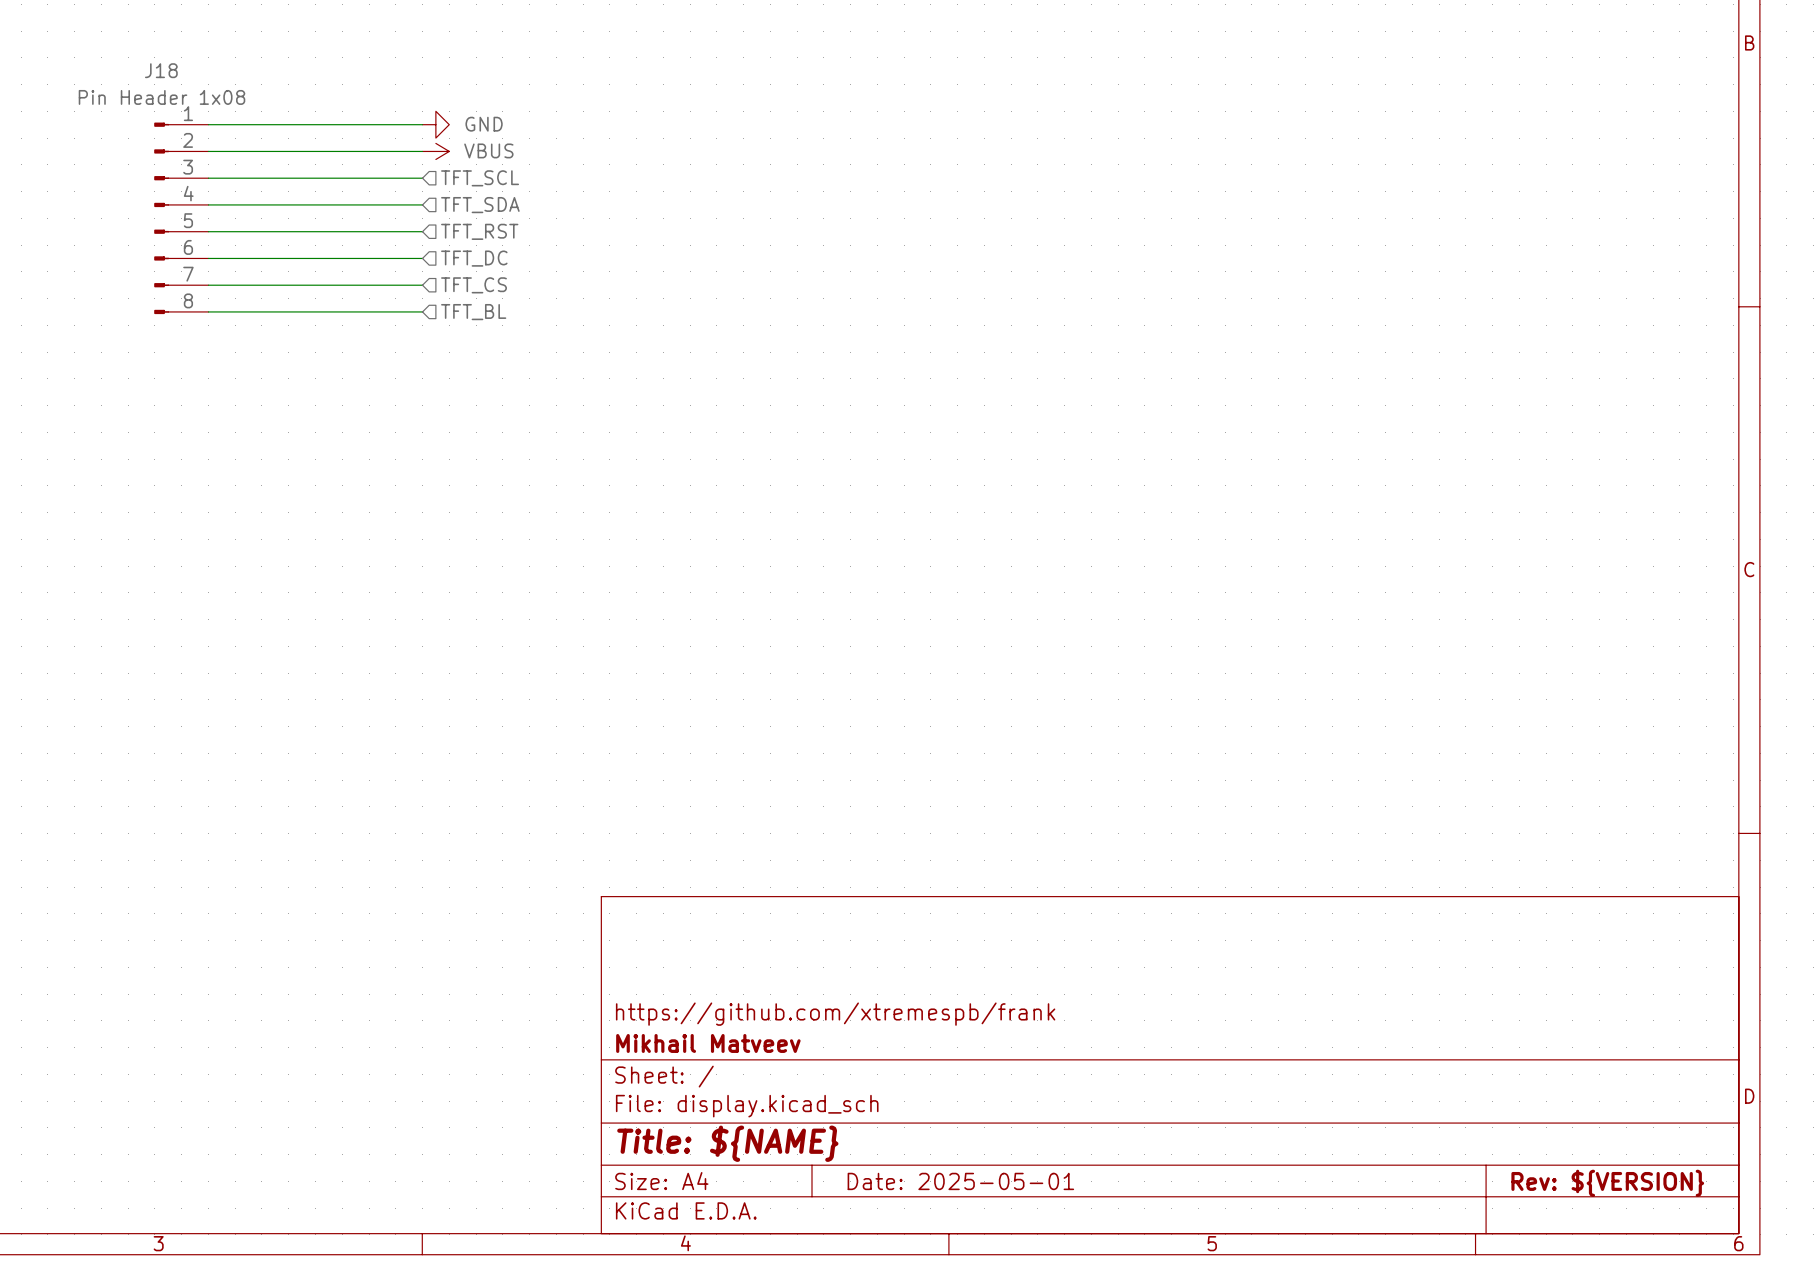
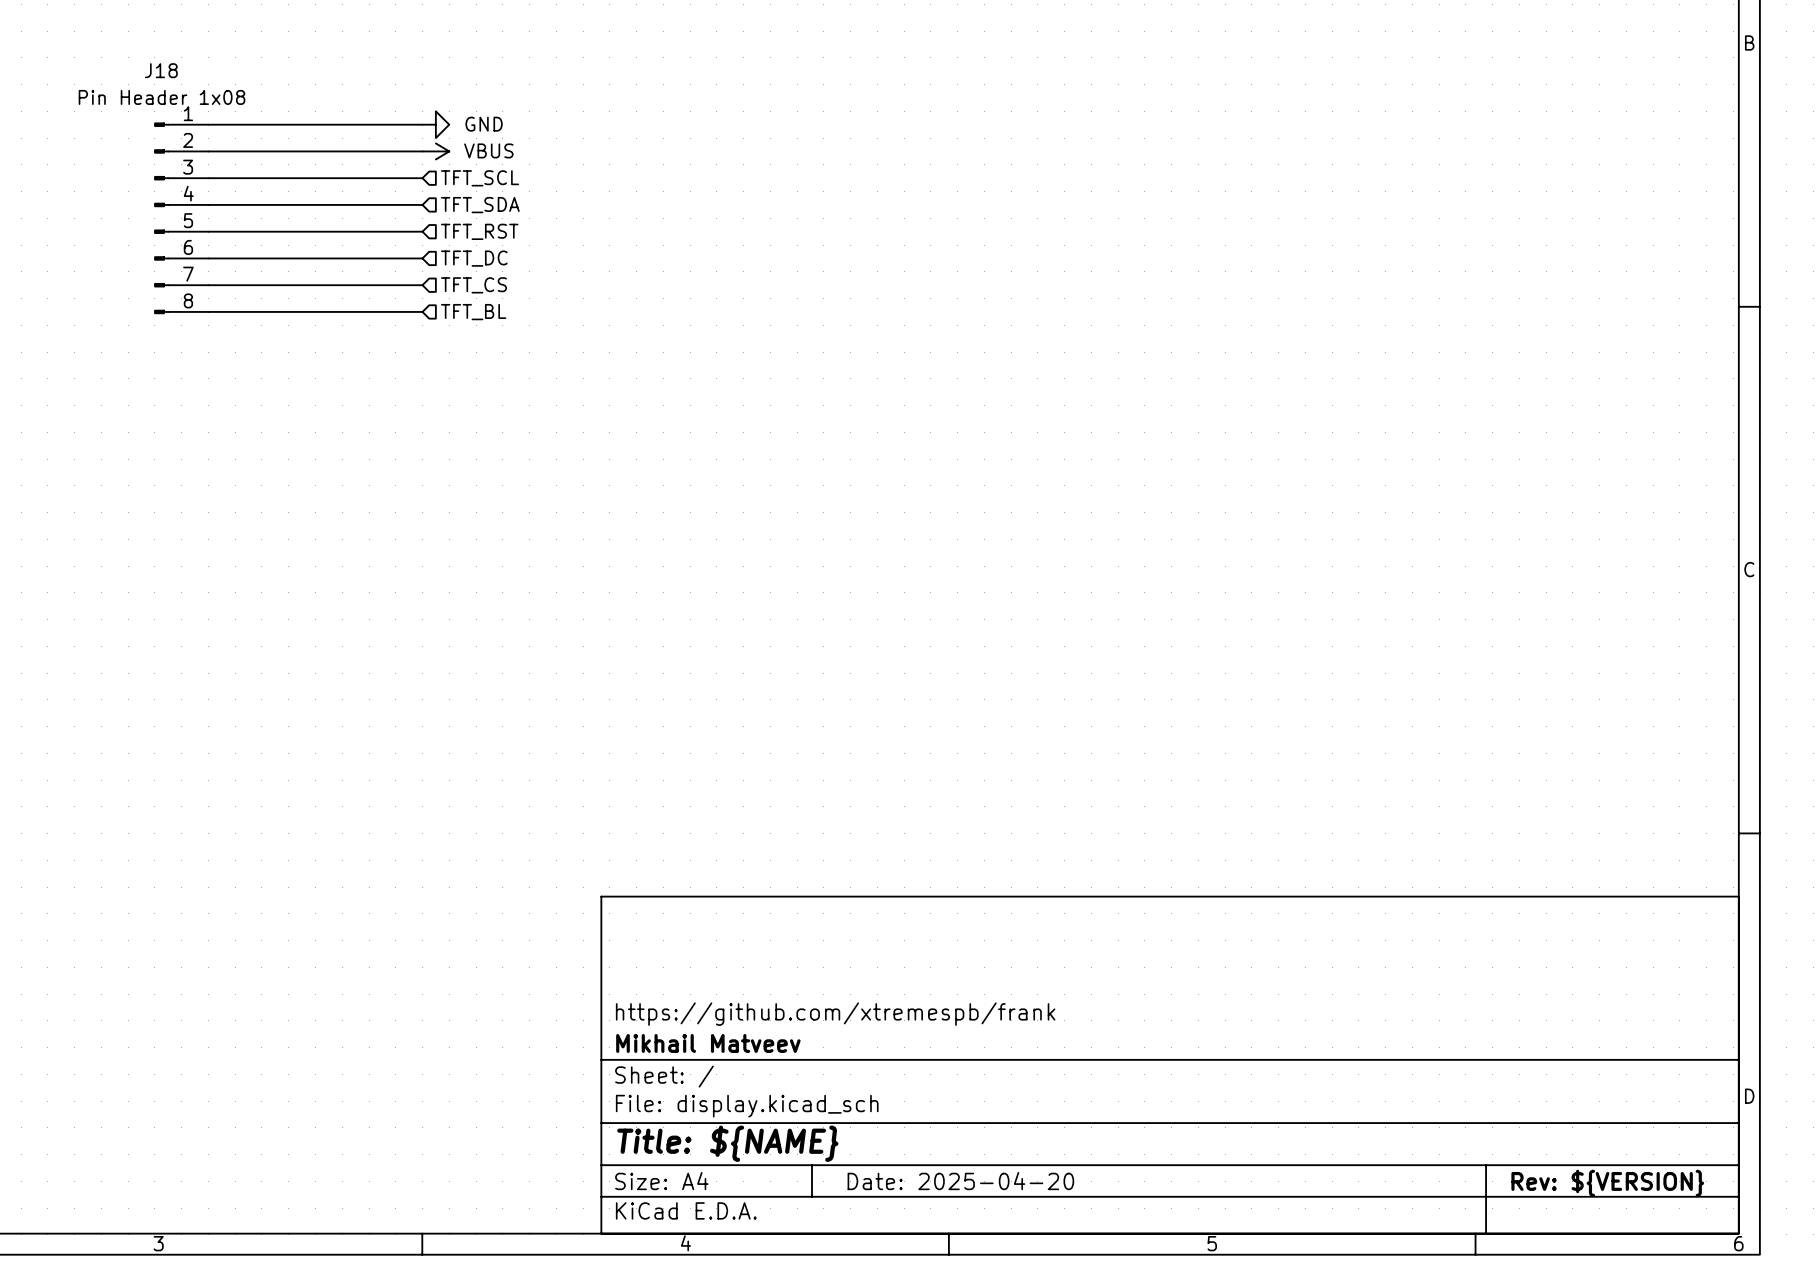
title block: Date: 2025-05-01 (960, 1181) -> Date: 2025-04-20 (960, 1181)

